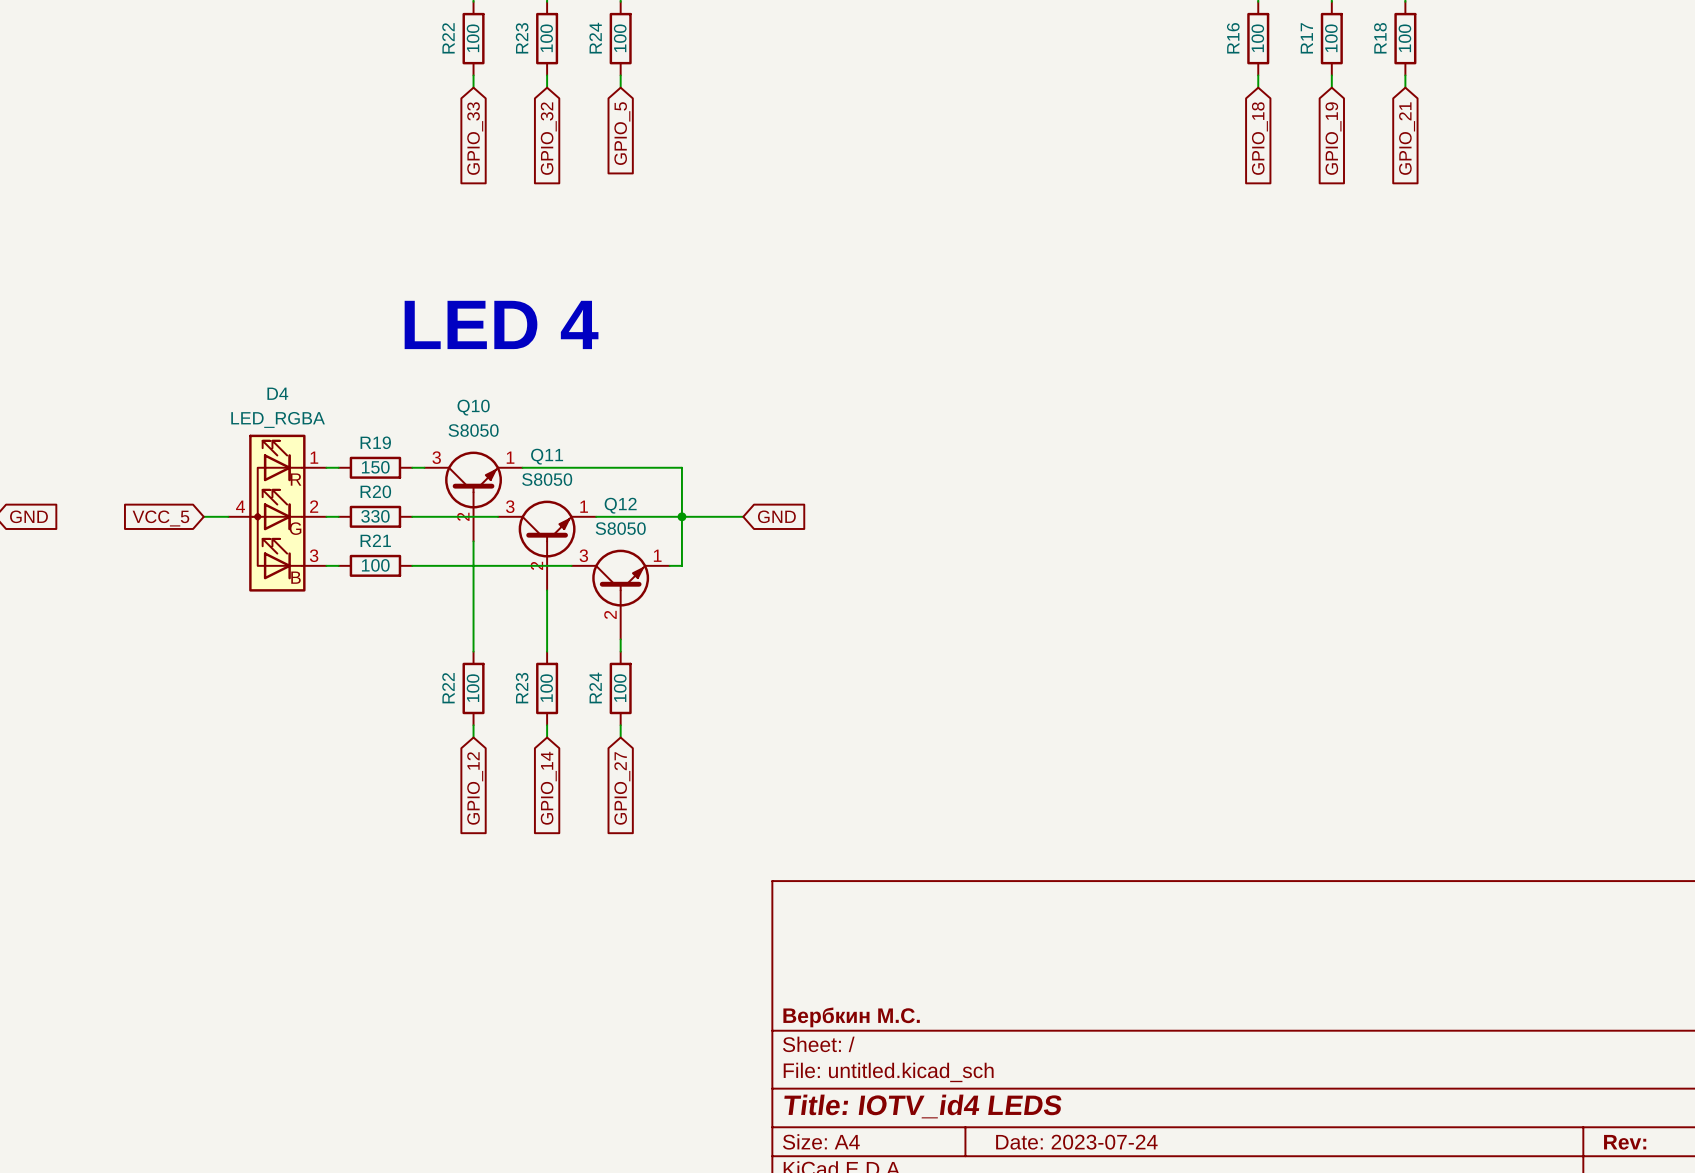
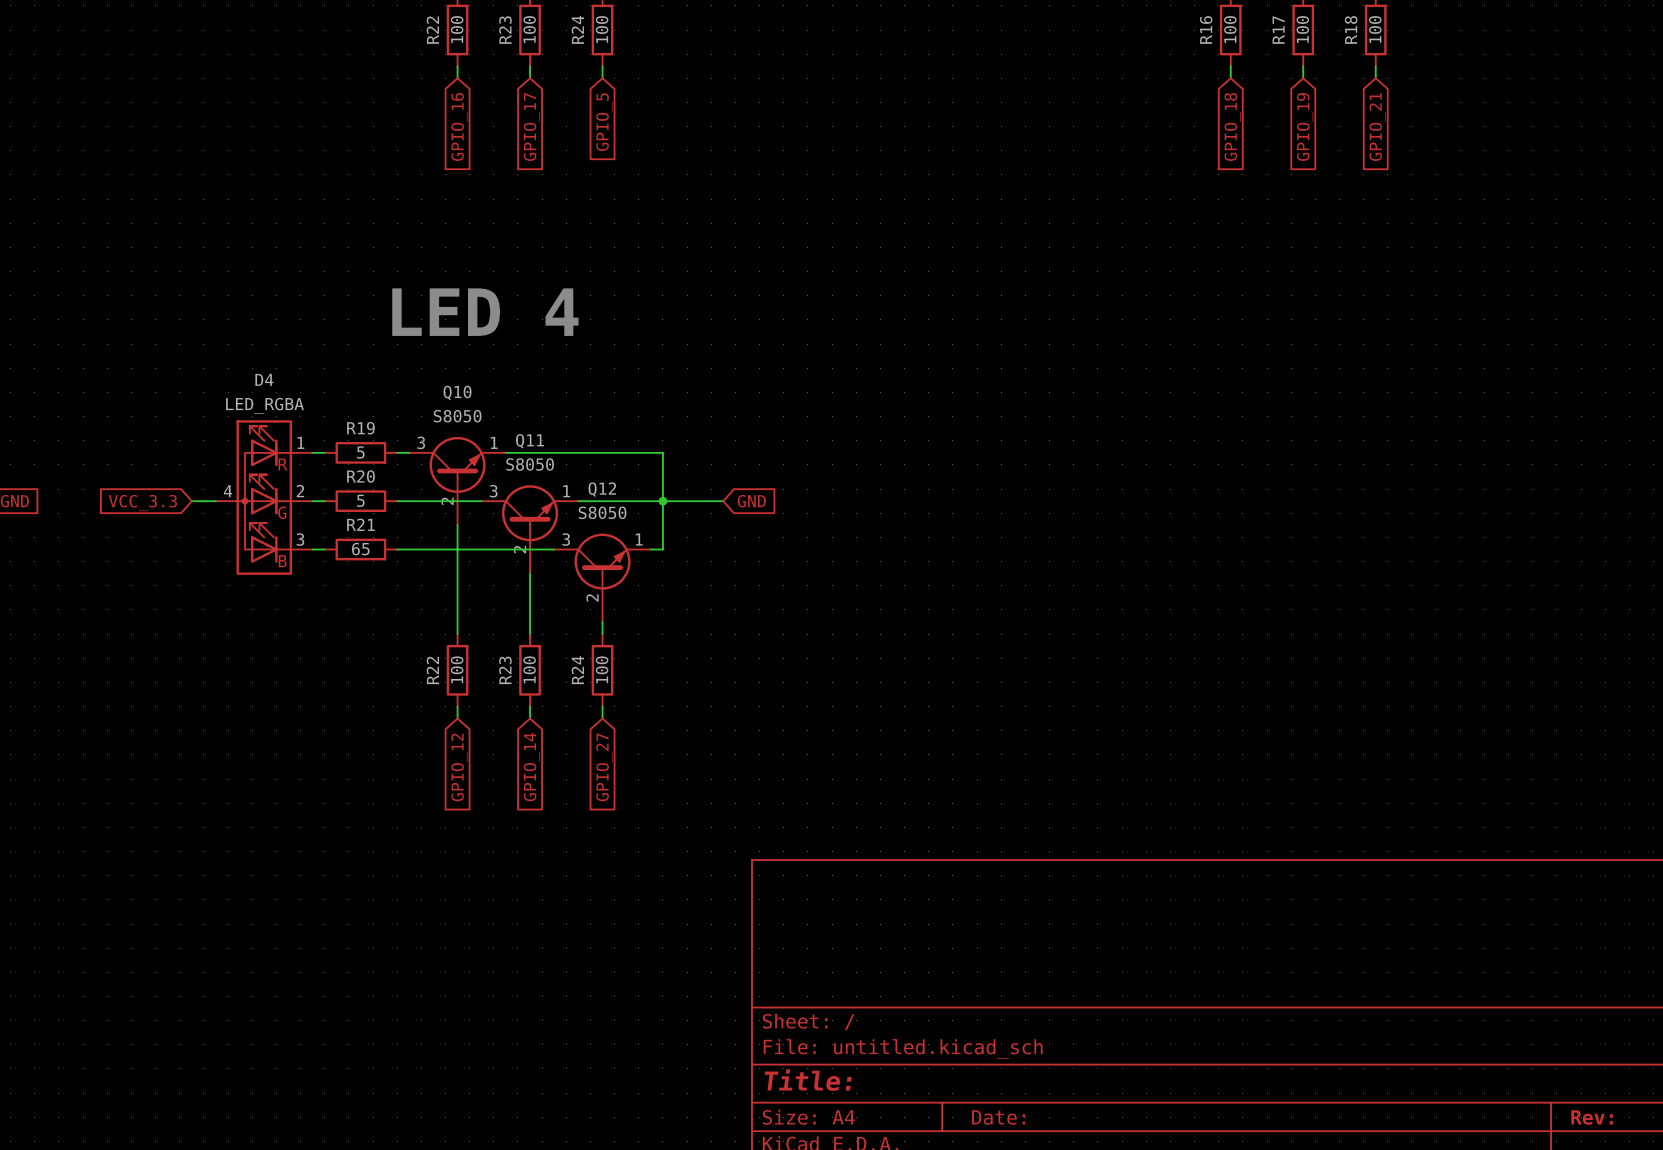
global label: GPIO_33 (475, 138) -> GPIO_16 (459, 126)
global label: GPIO_32 (548, 138) -> GPIO_17 (531, 127)
R19 value: 150 (375, 467) -> 5 (360, 452)
R20 value: 330 (375, 516) -> 5 (360, 500)
global label: VCC_5 (160, 518) -> VCC_3.3 (142, 503)
R21 value: 100 (375, 565) -> 65 (360, 549)
title block: Вербкин М.С. (851, 1017) -> none
title block: Title: IOTV_id4 LEDS (922, 1106) -> Title: (808, 1080)
title block: Date: 2023-07-24 (1076, 1142) -> Date: (998, 1117)

